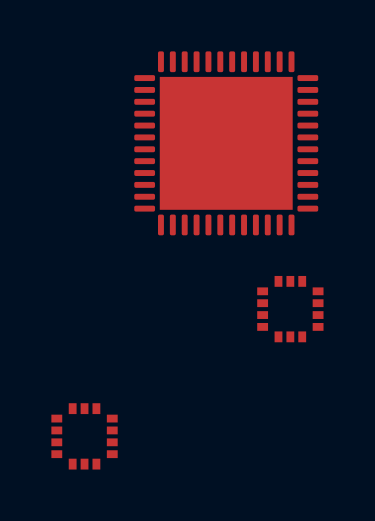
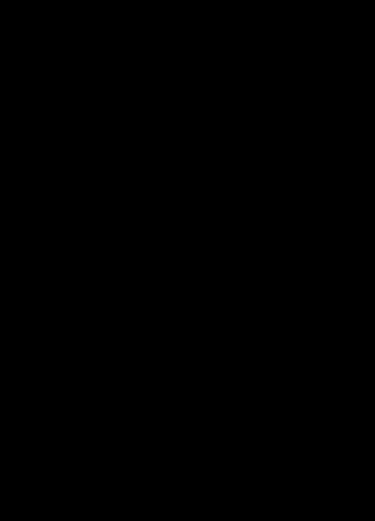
part: (226, 143) -> none
part: (290, 309) -> none
part: (84, 436) -> none

